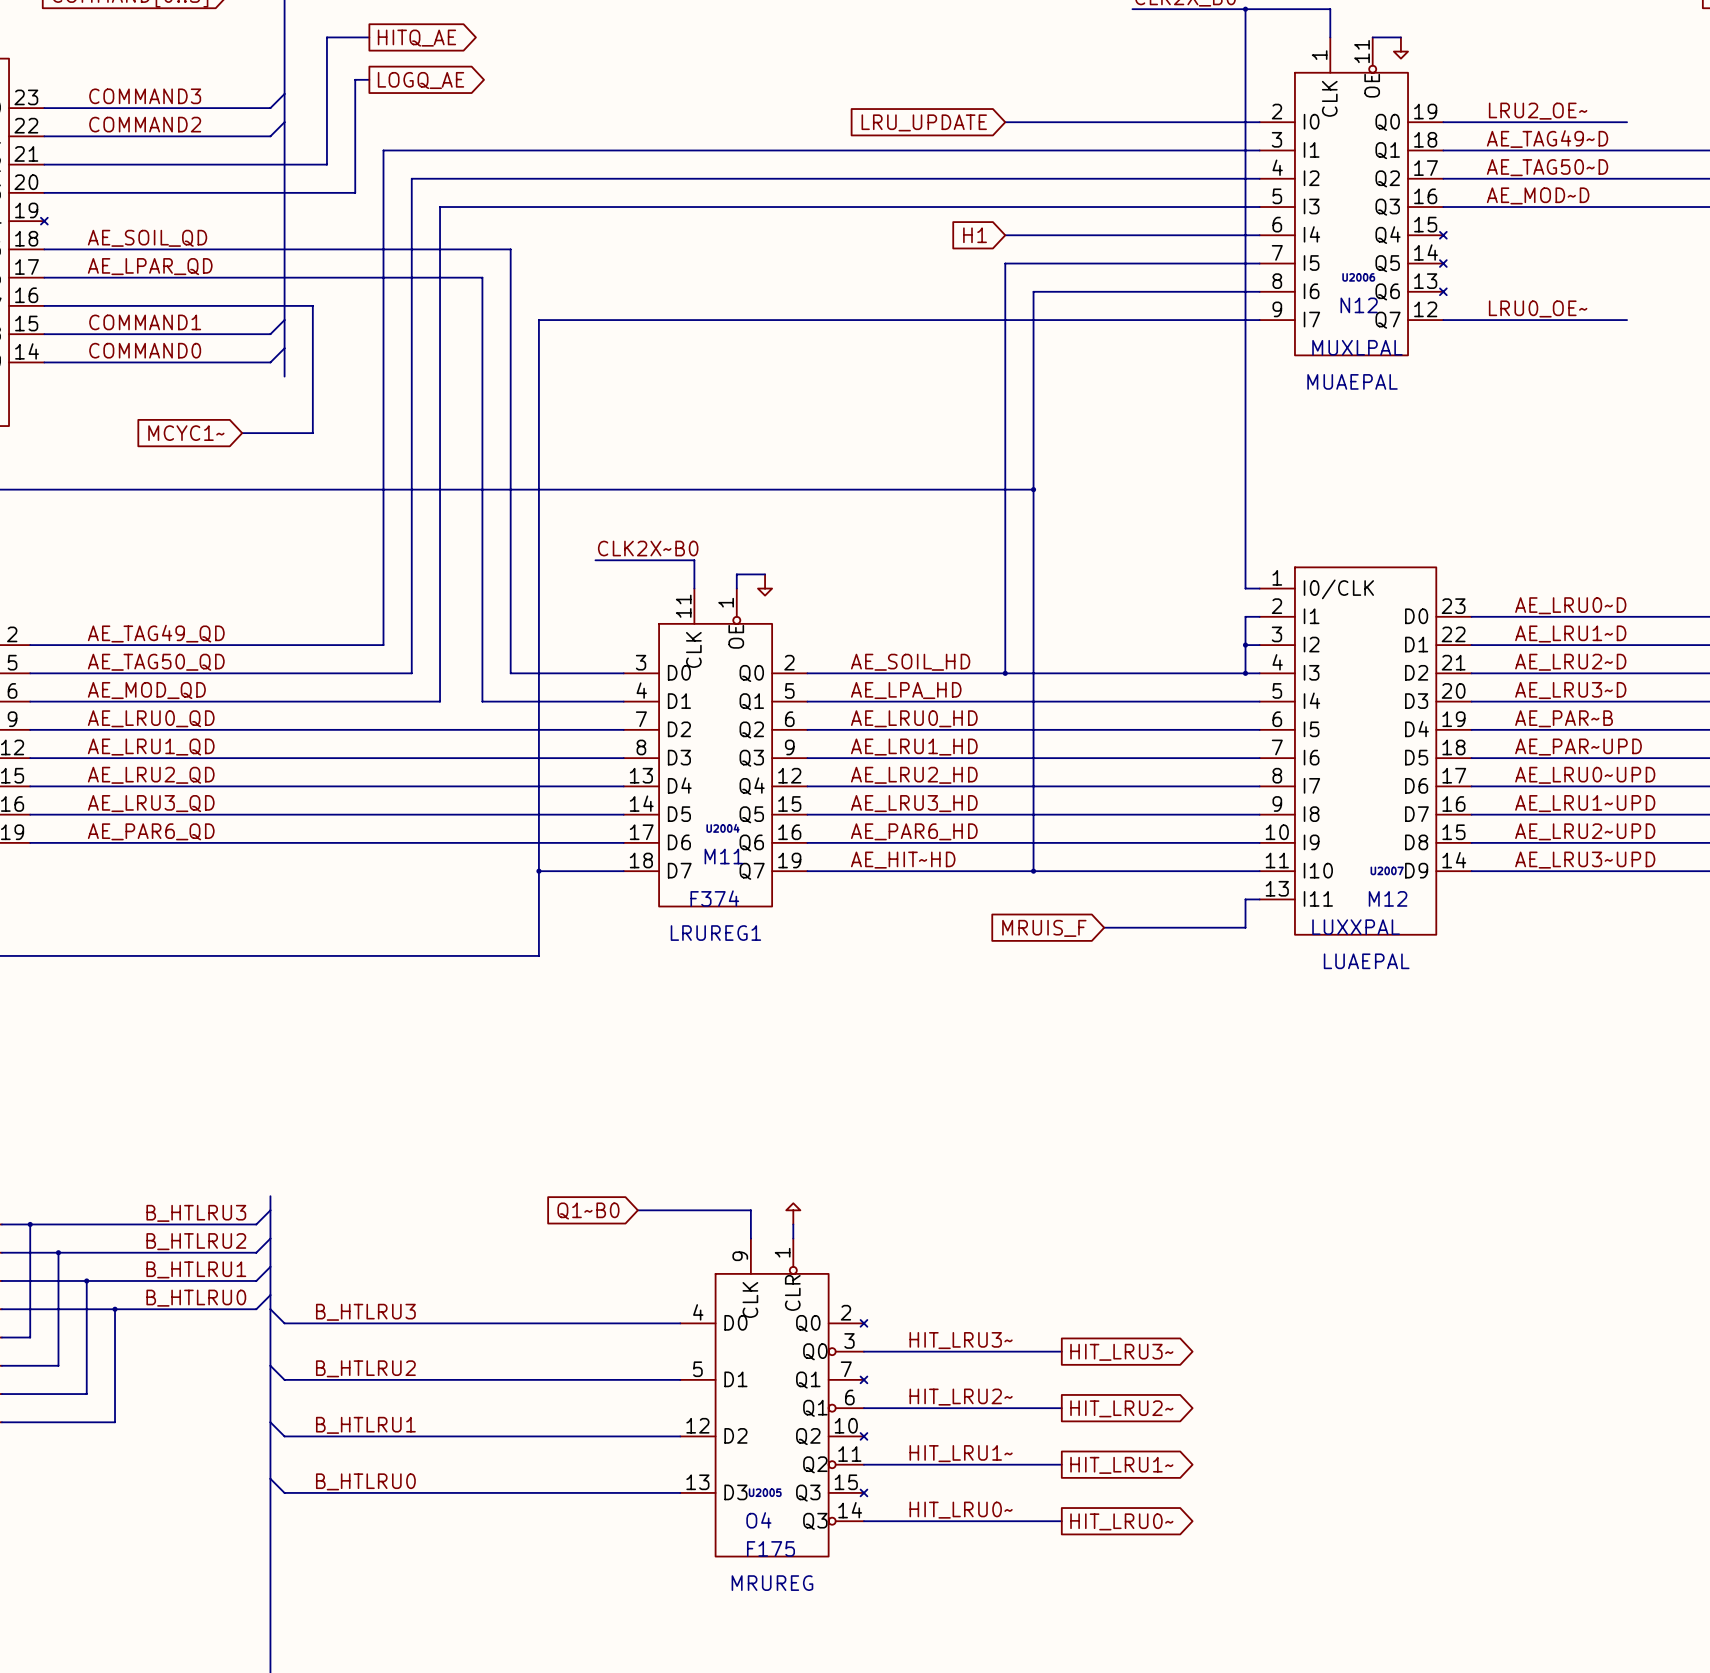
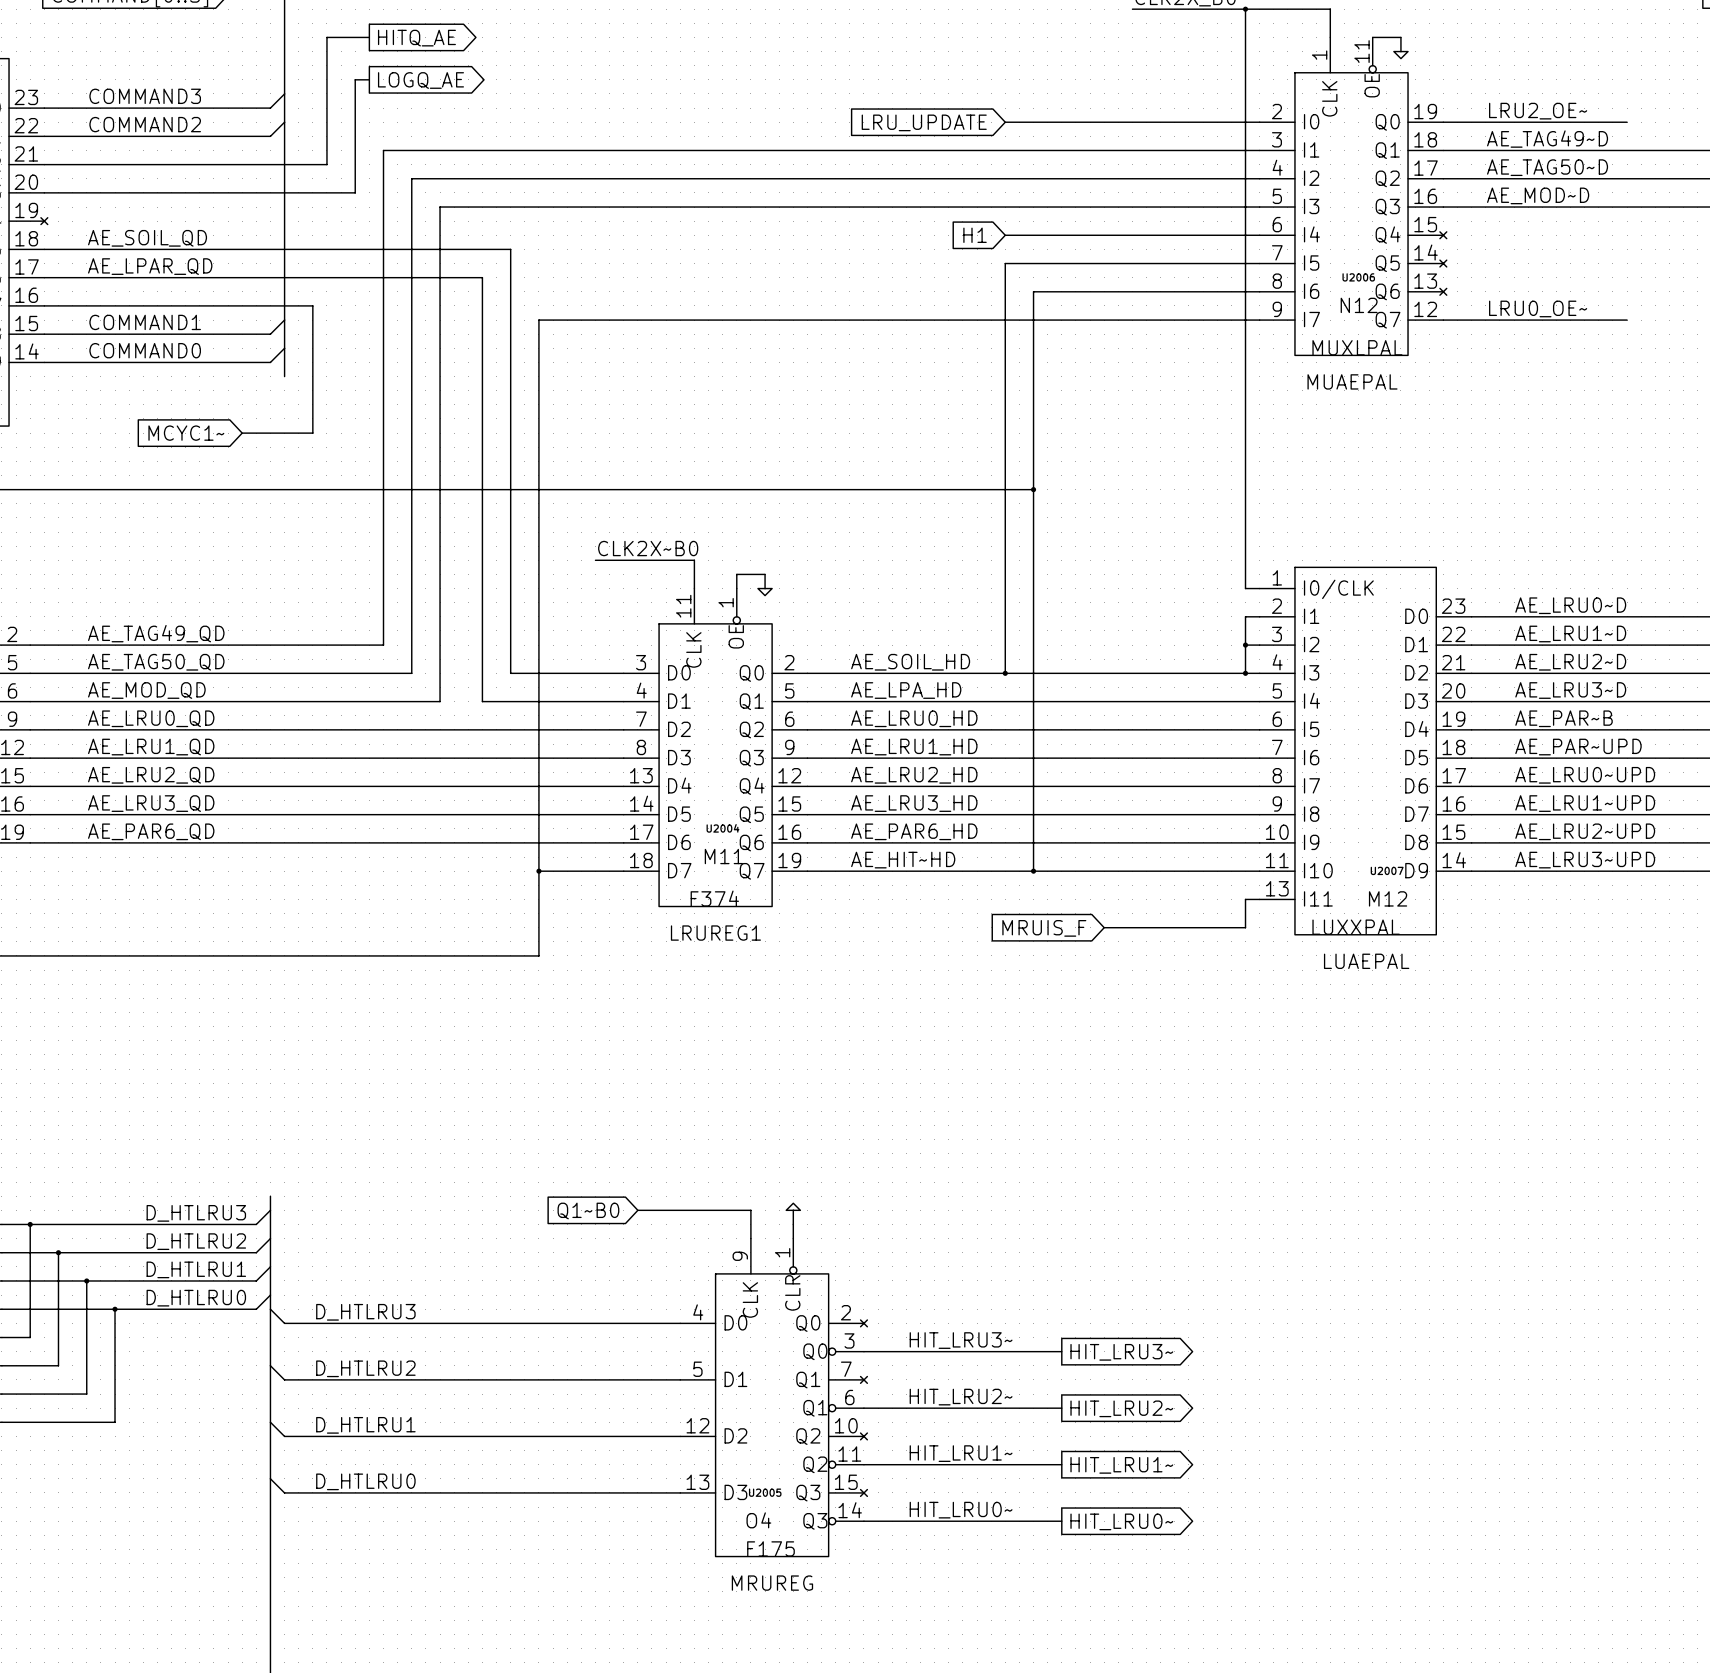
label: B_HTLRU3 (196, 1213) -> D_HTLRU3 (196, 1213)
label: B_HTLRU2 (196, 1241) -> D_HTLRU2 (196, 1241)
label: B_HTLRU1 (196, 1269) -> D_HTLRU1 (196, 1269)
label: B_HTLRU0 (196, 1298) -> D_HTLRU0 (196, 1298)
label: B_HTLRU3 (365, 1312) -> D_HTLRU3 (365, 1312)
label: B_HTLRU2 (365, 1368) -> D_HTLRU2 (365, 1368)
label: B_HTLRU1 (365, 1425) -> D_HTLRU1 (365, 1425)
label: B_HTLRU0 (365, 1481) -> D_HTLRU0 (365, 1481)

